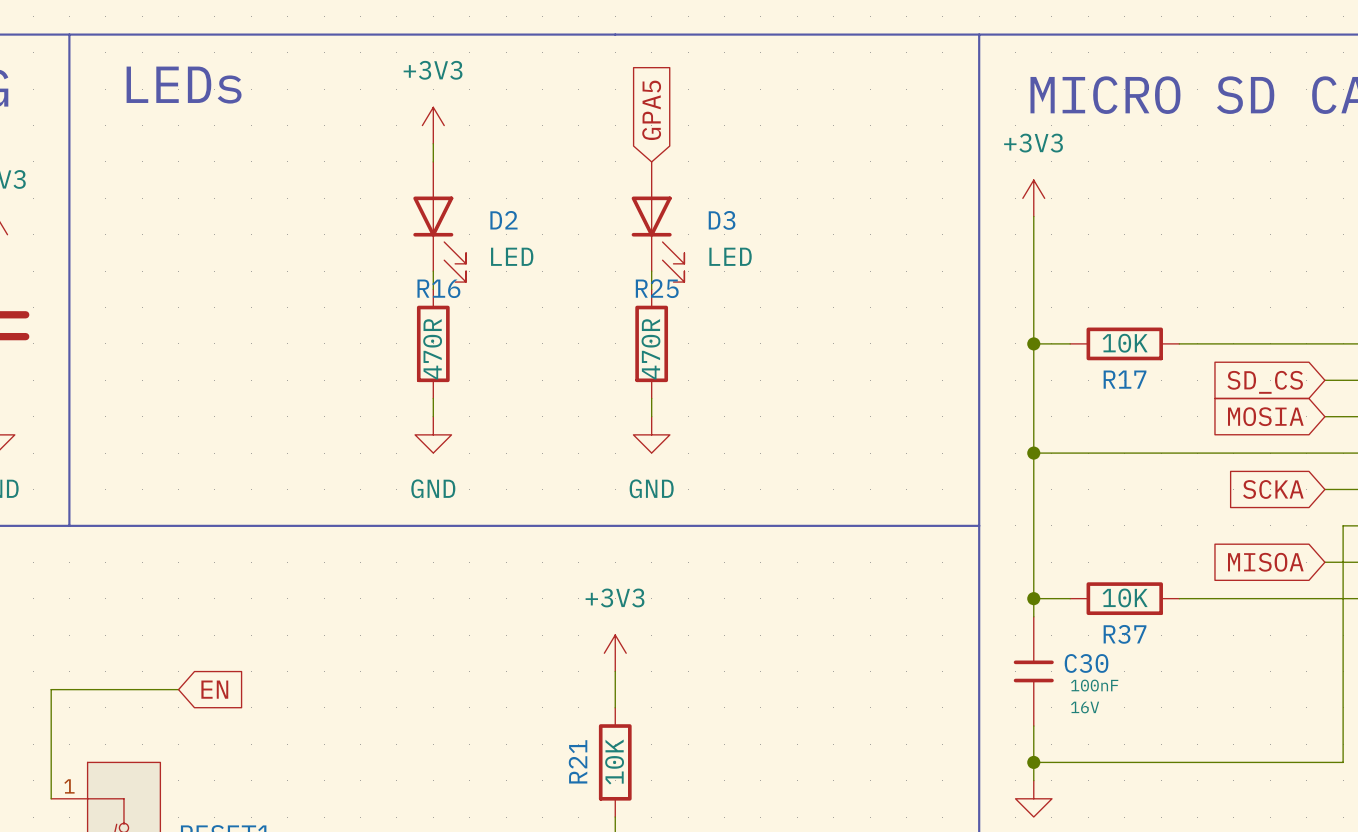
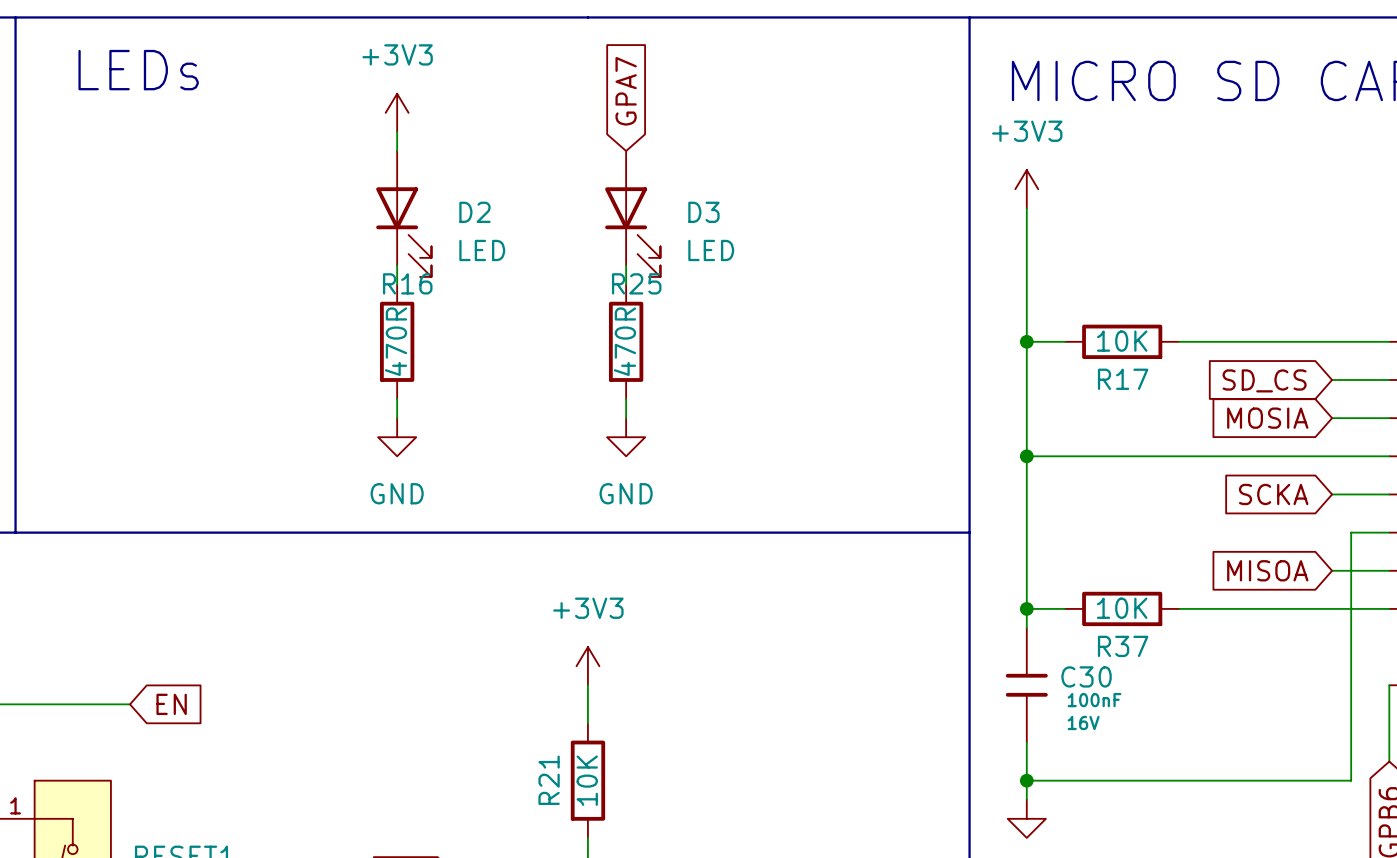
global label: GPA5 (651, 110) -> GPA7 (626, 91)

